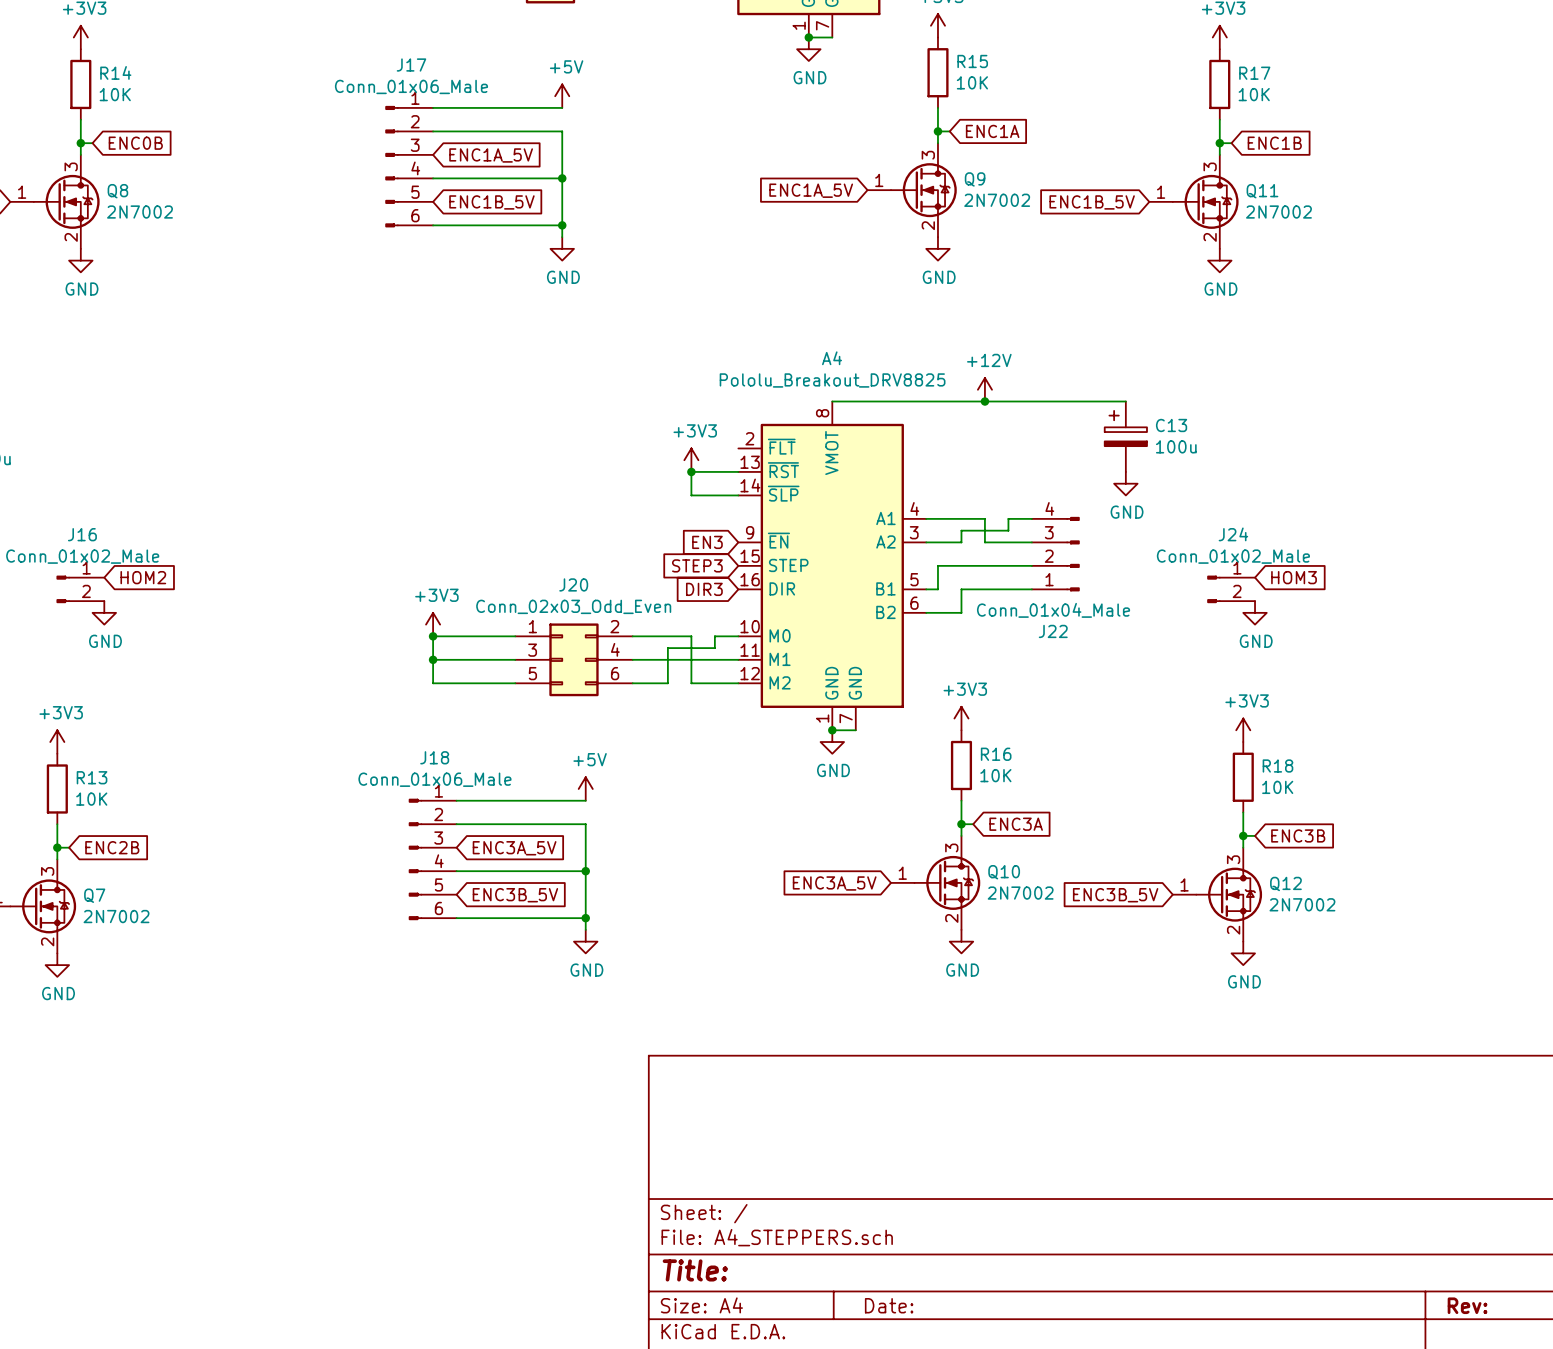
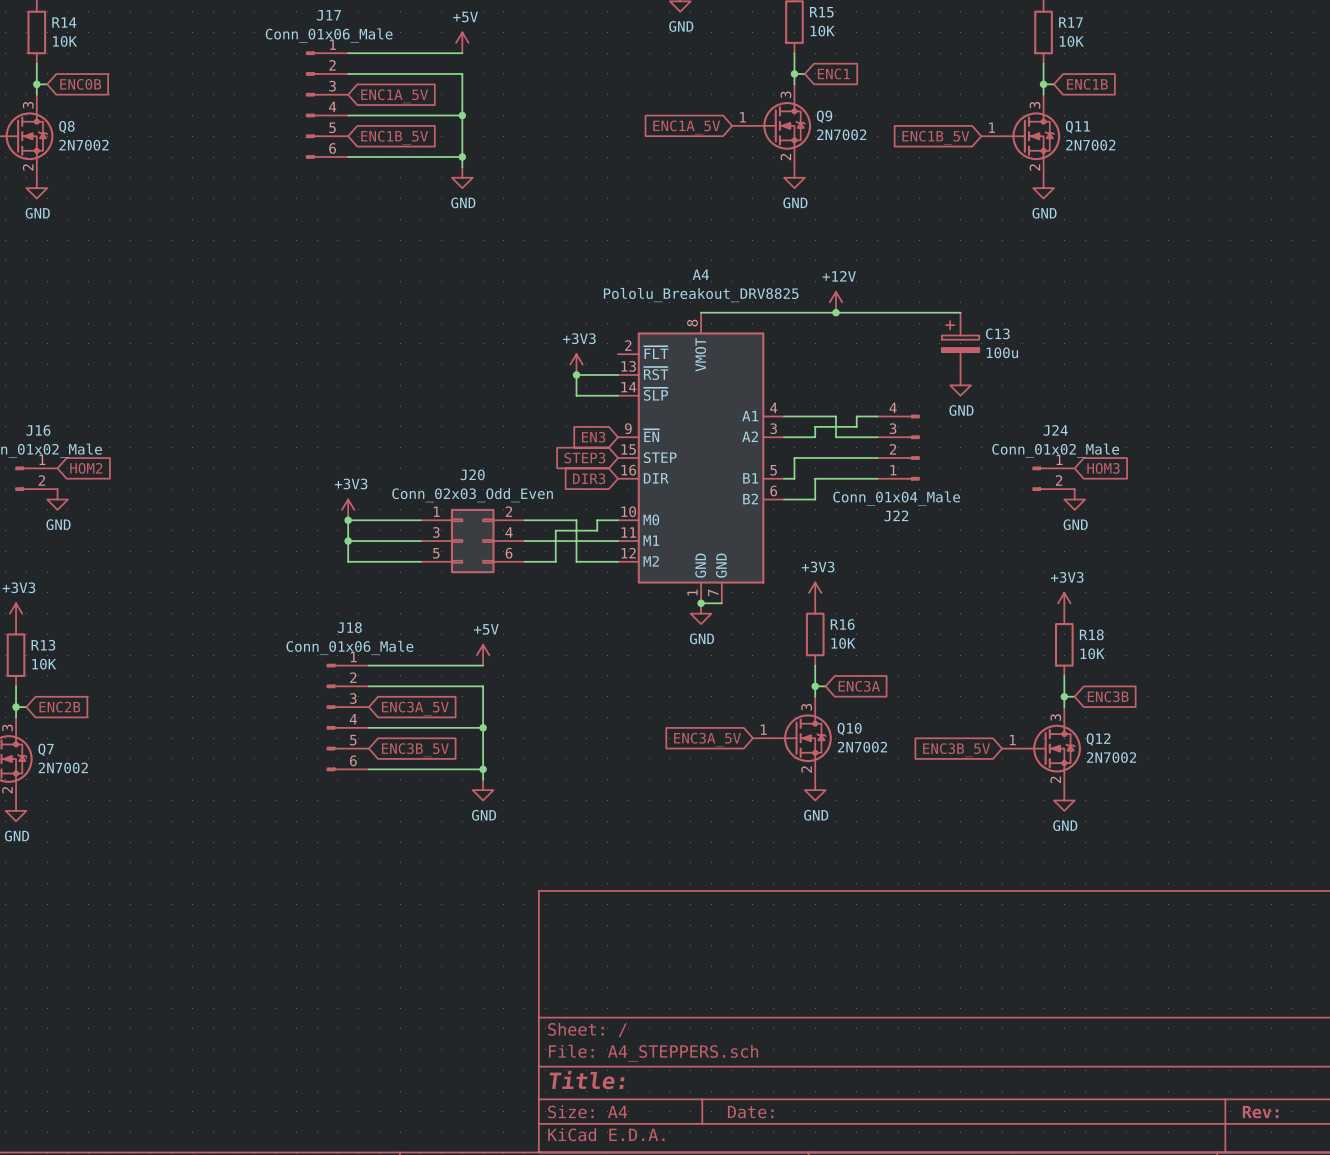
global label: ENC1A (992, 131) -> ENC1 (833, 73)

